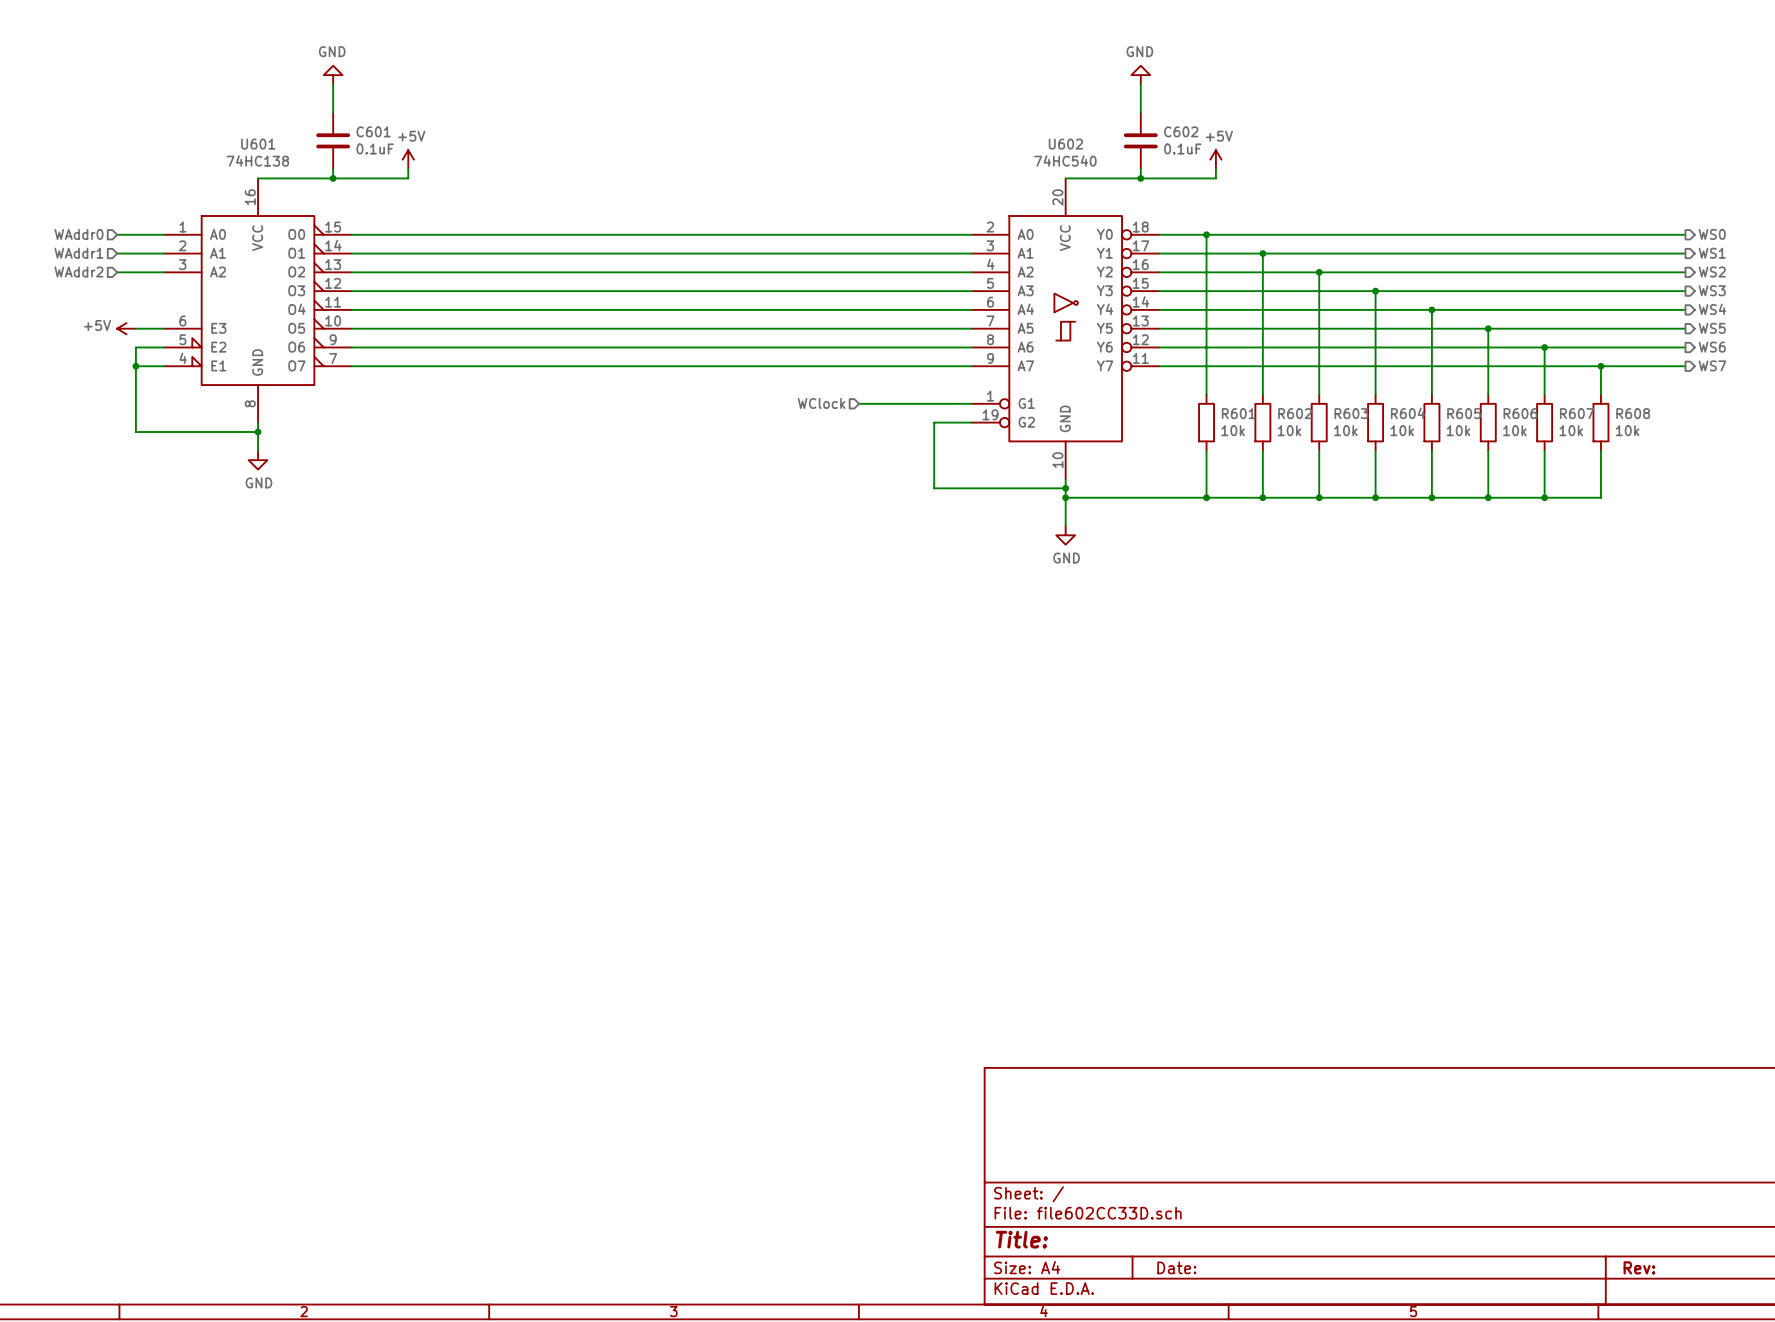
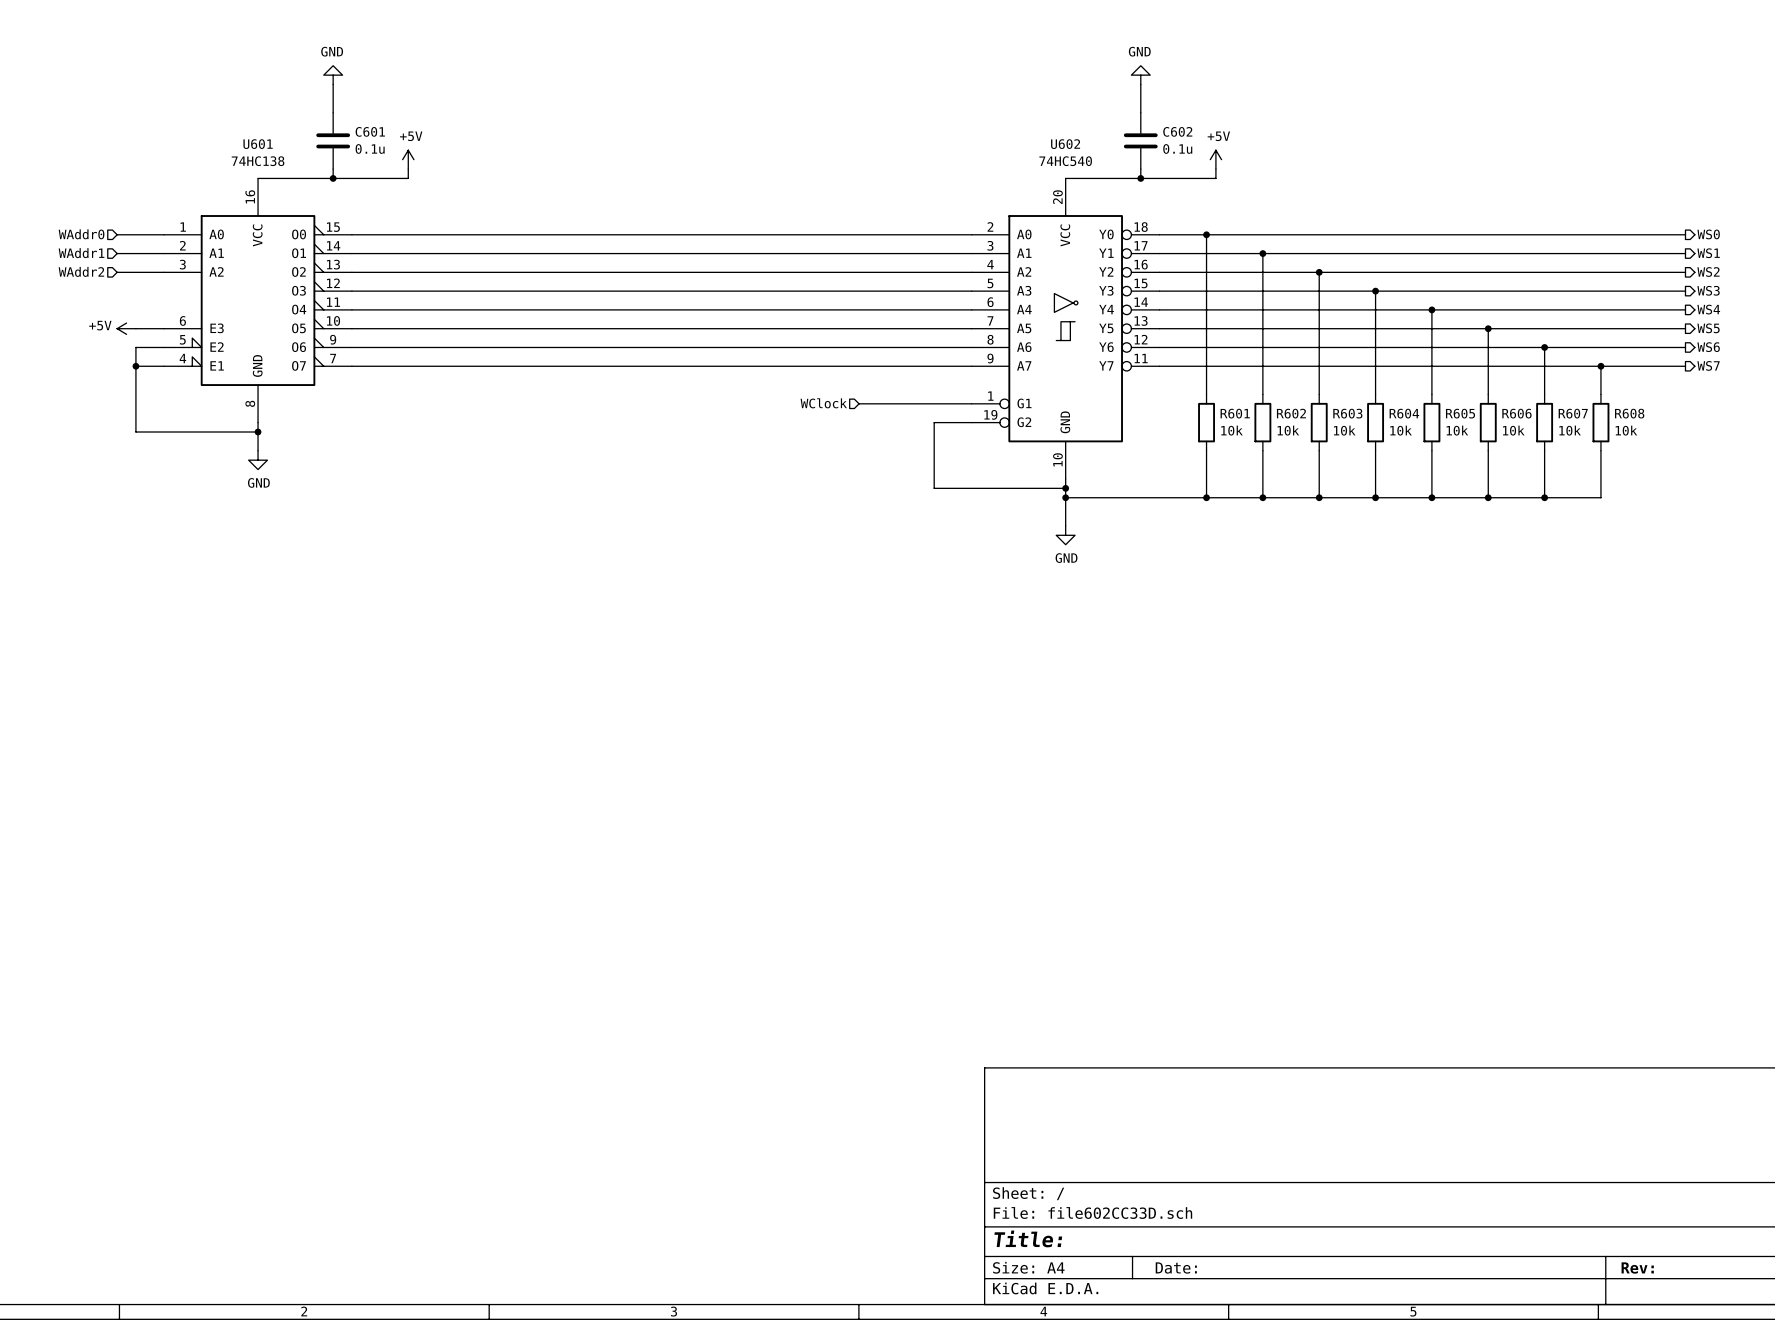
C601 value: 0.1uF (375, 148) -> 0.1u (370, 148)
C602 value: 0.1uF (1182, 148) -> 0.1u (1177, 148)

